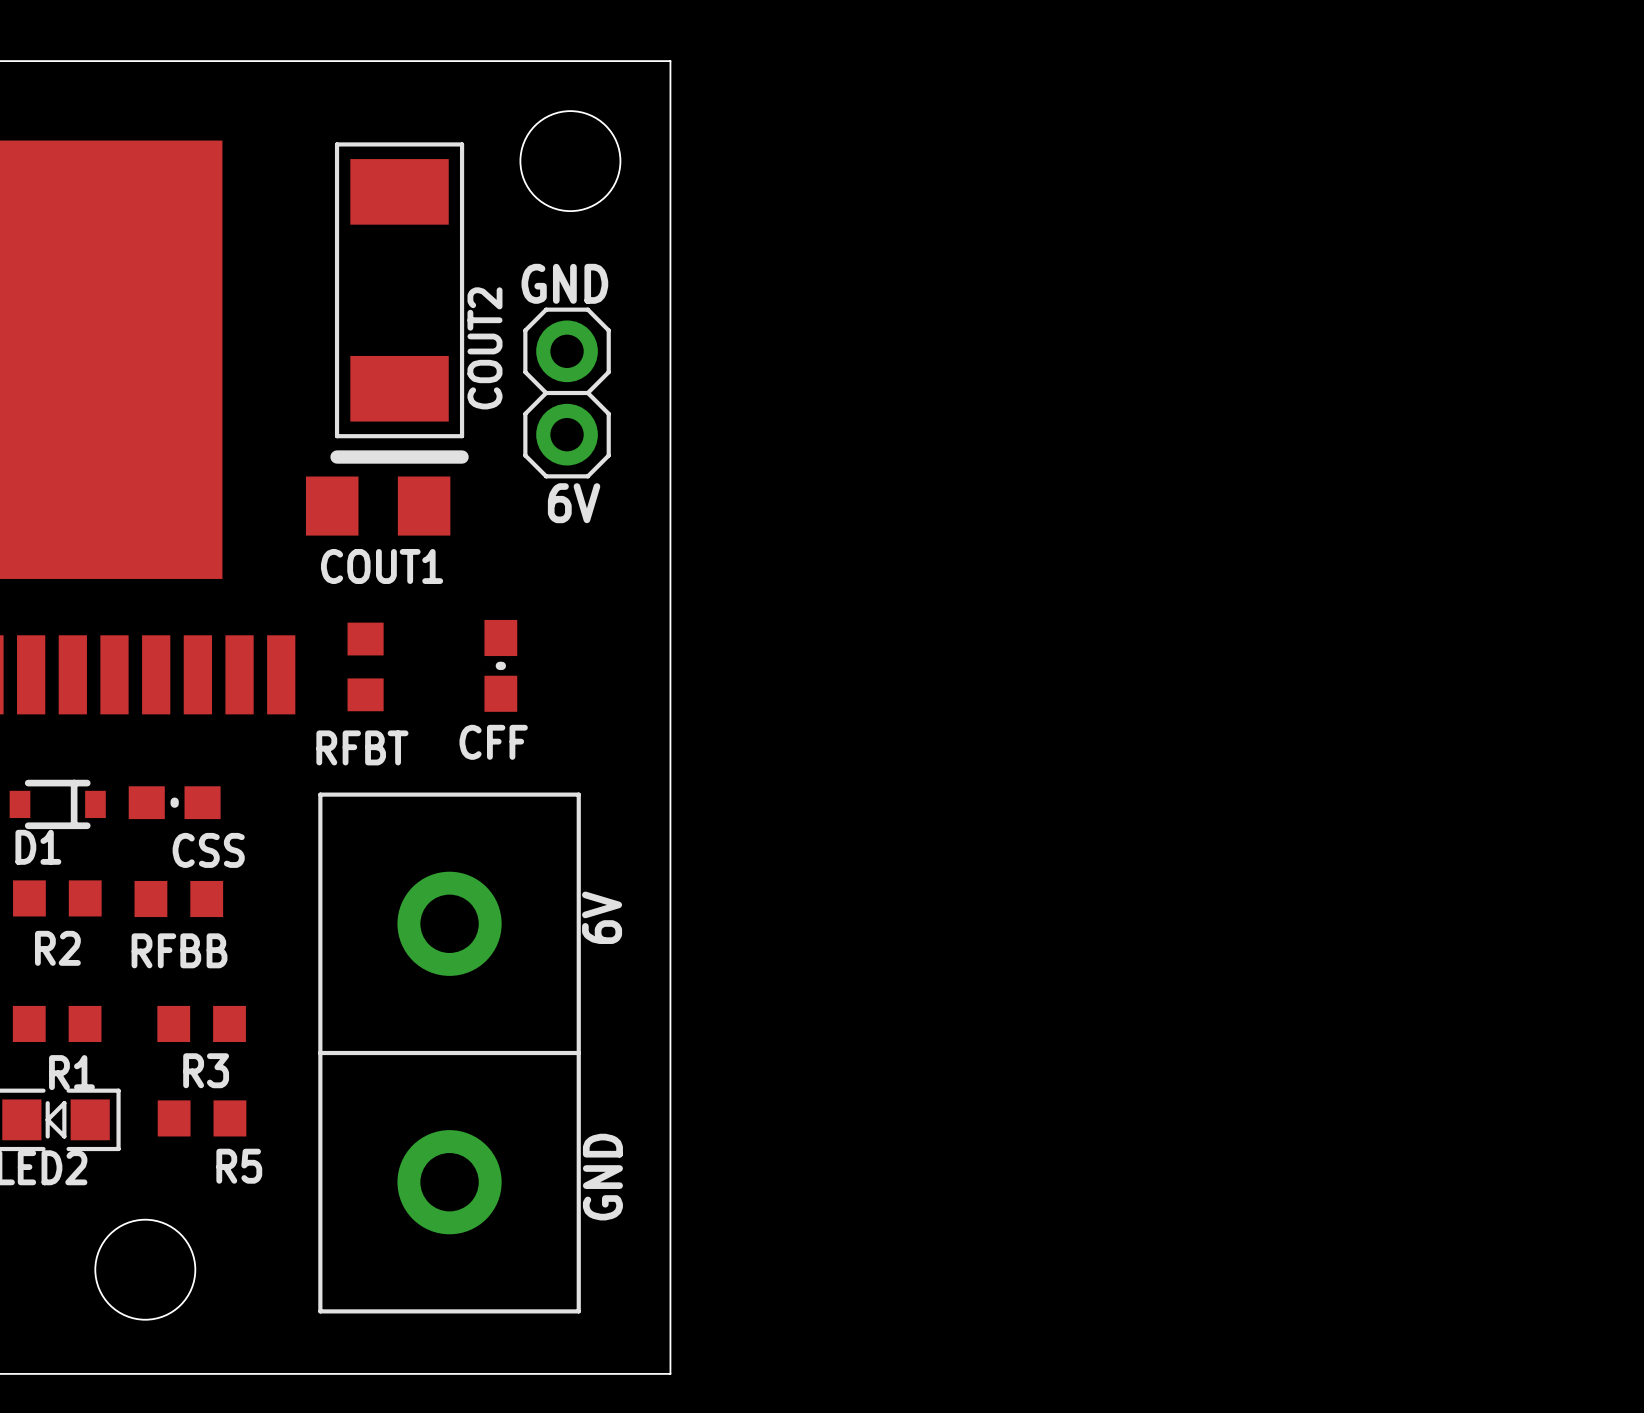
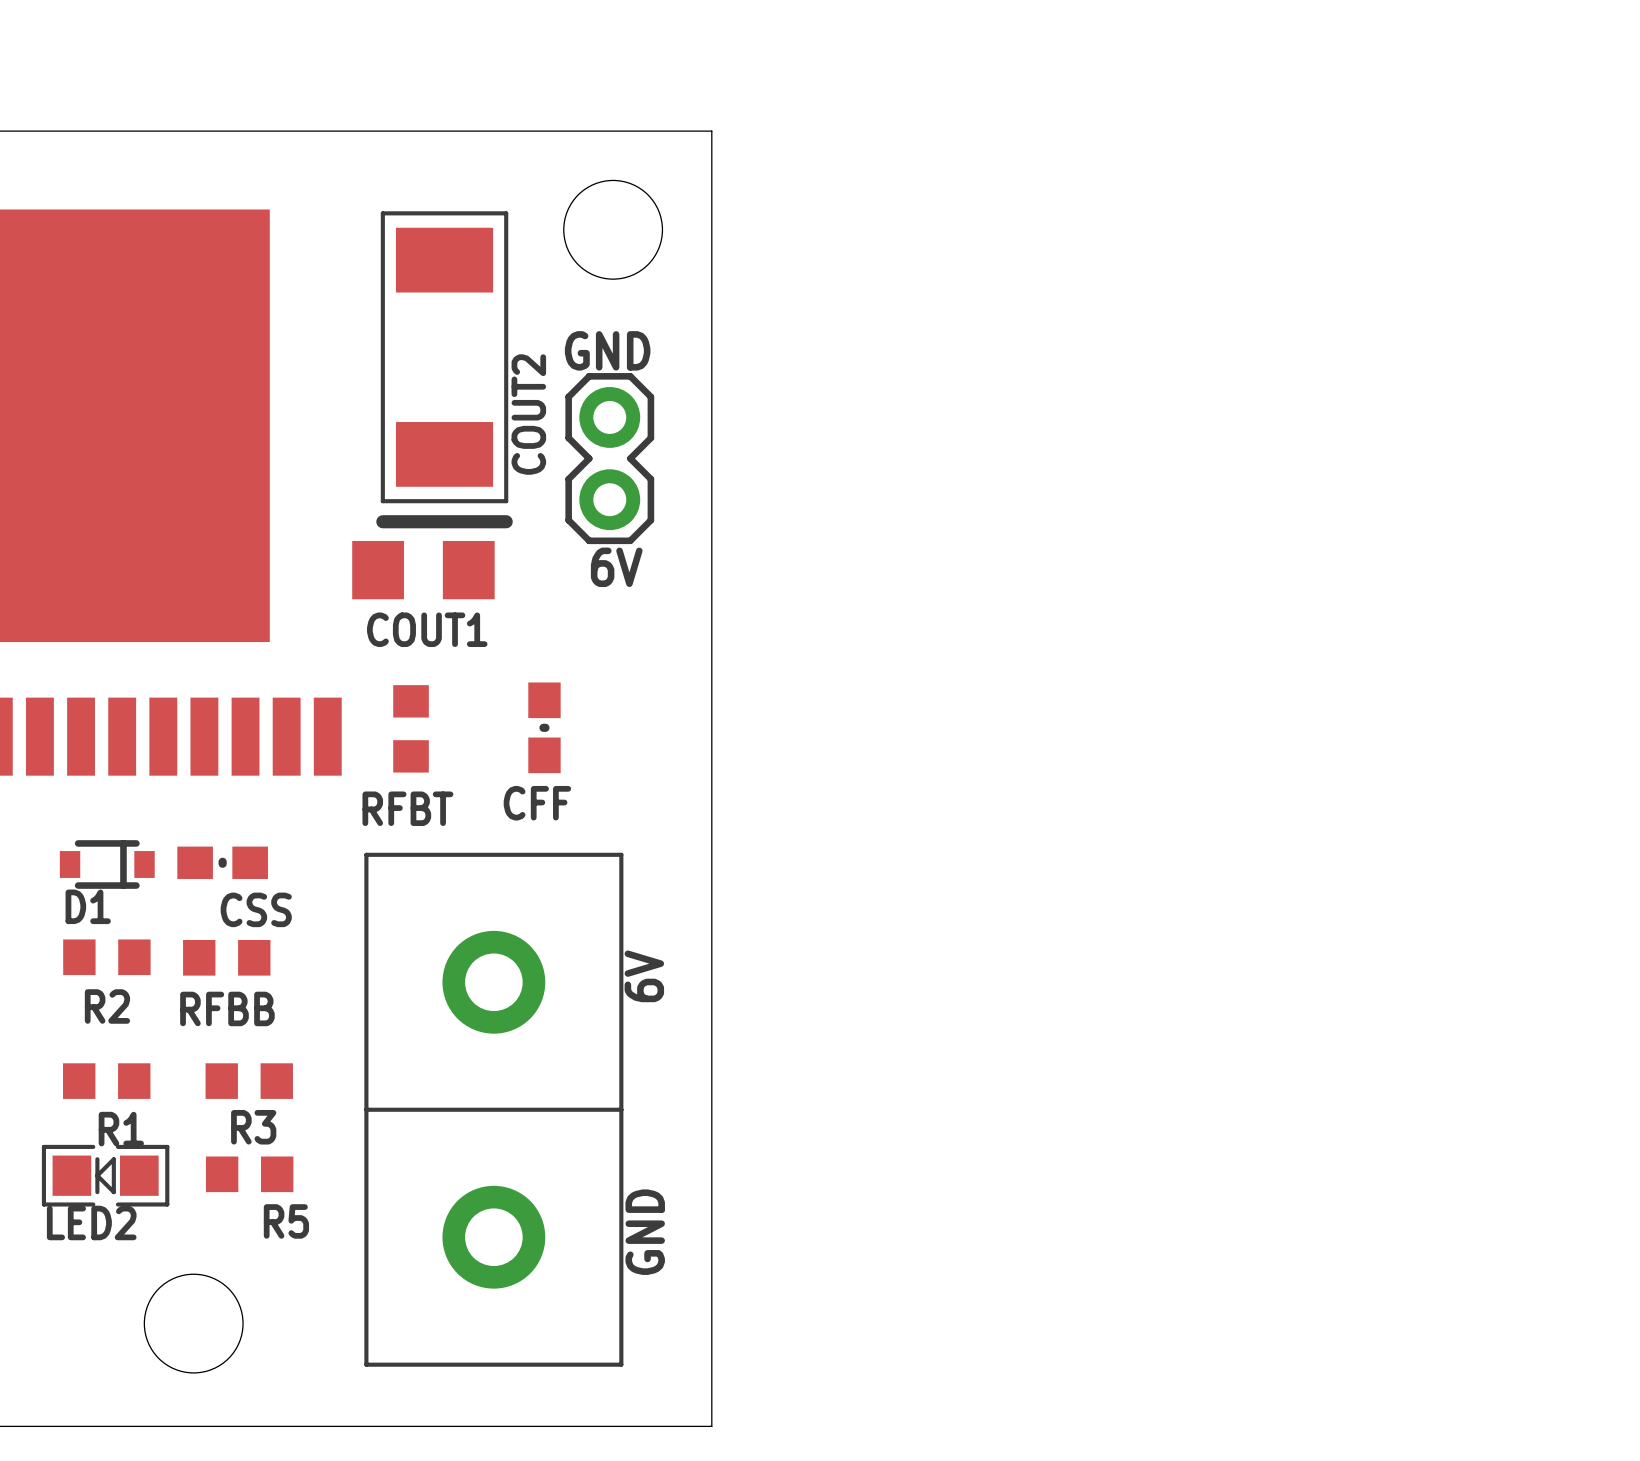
part footprint: [523, 307, 611, 479] -> [565, 373, 655, 545]

